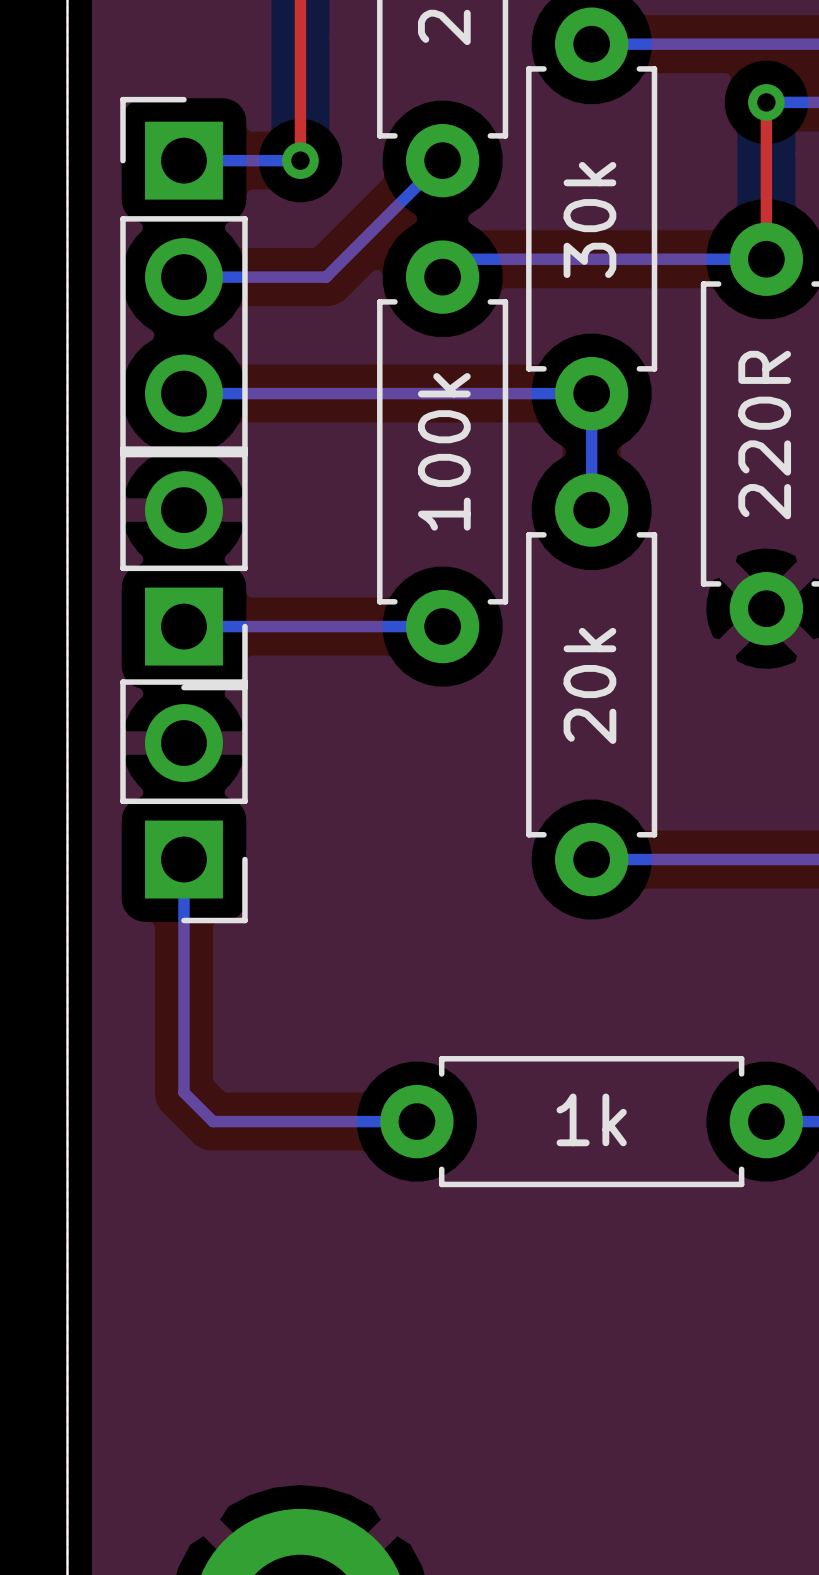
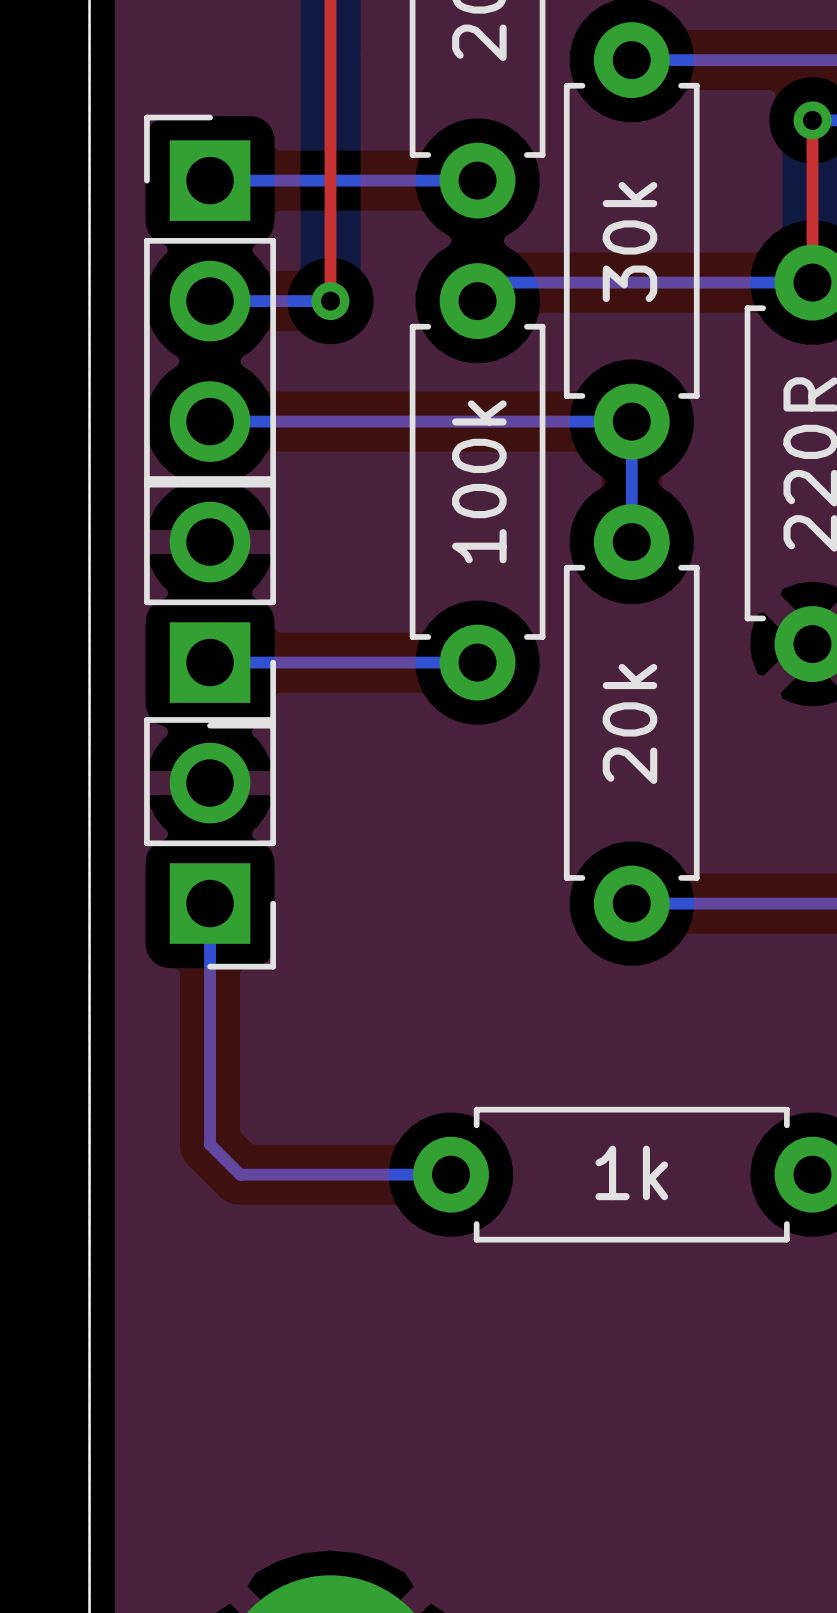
top track: none -> (330, 180) (330, 301)
via position: (300, 160) -> (330, 301)
bottom track: (442, 160) (326, 277) (300, 277) -> (477, 180) (330, 180)

